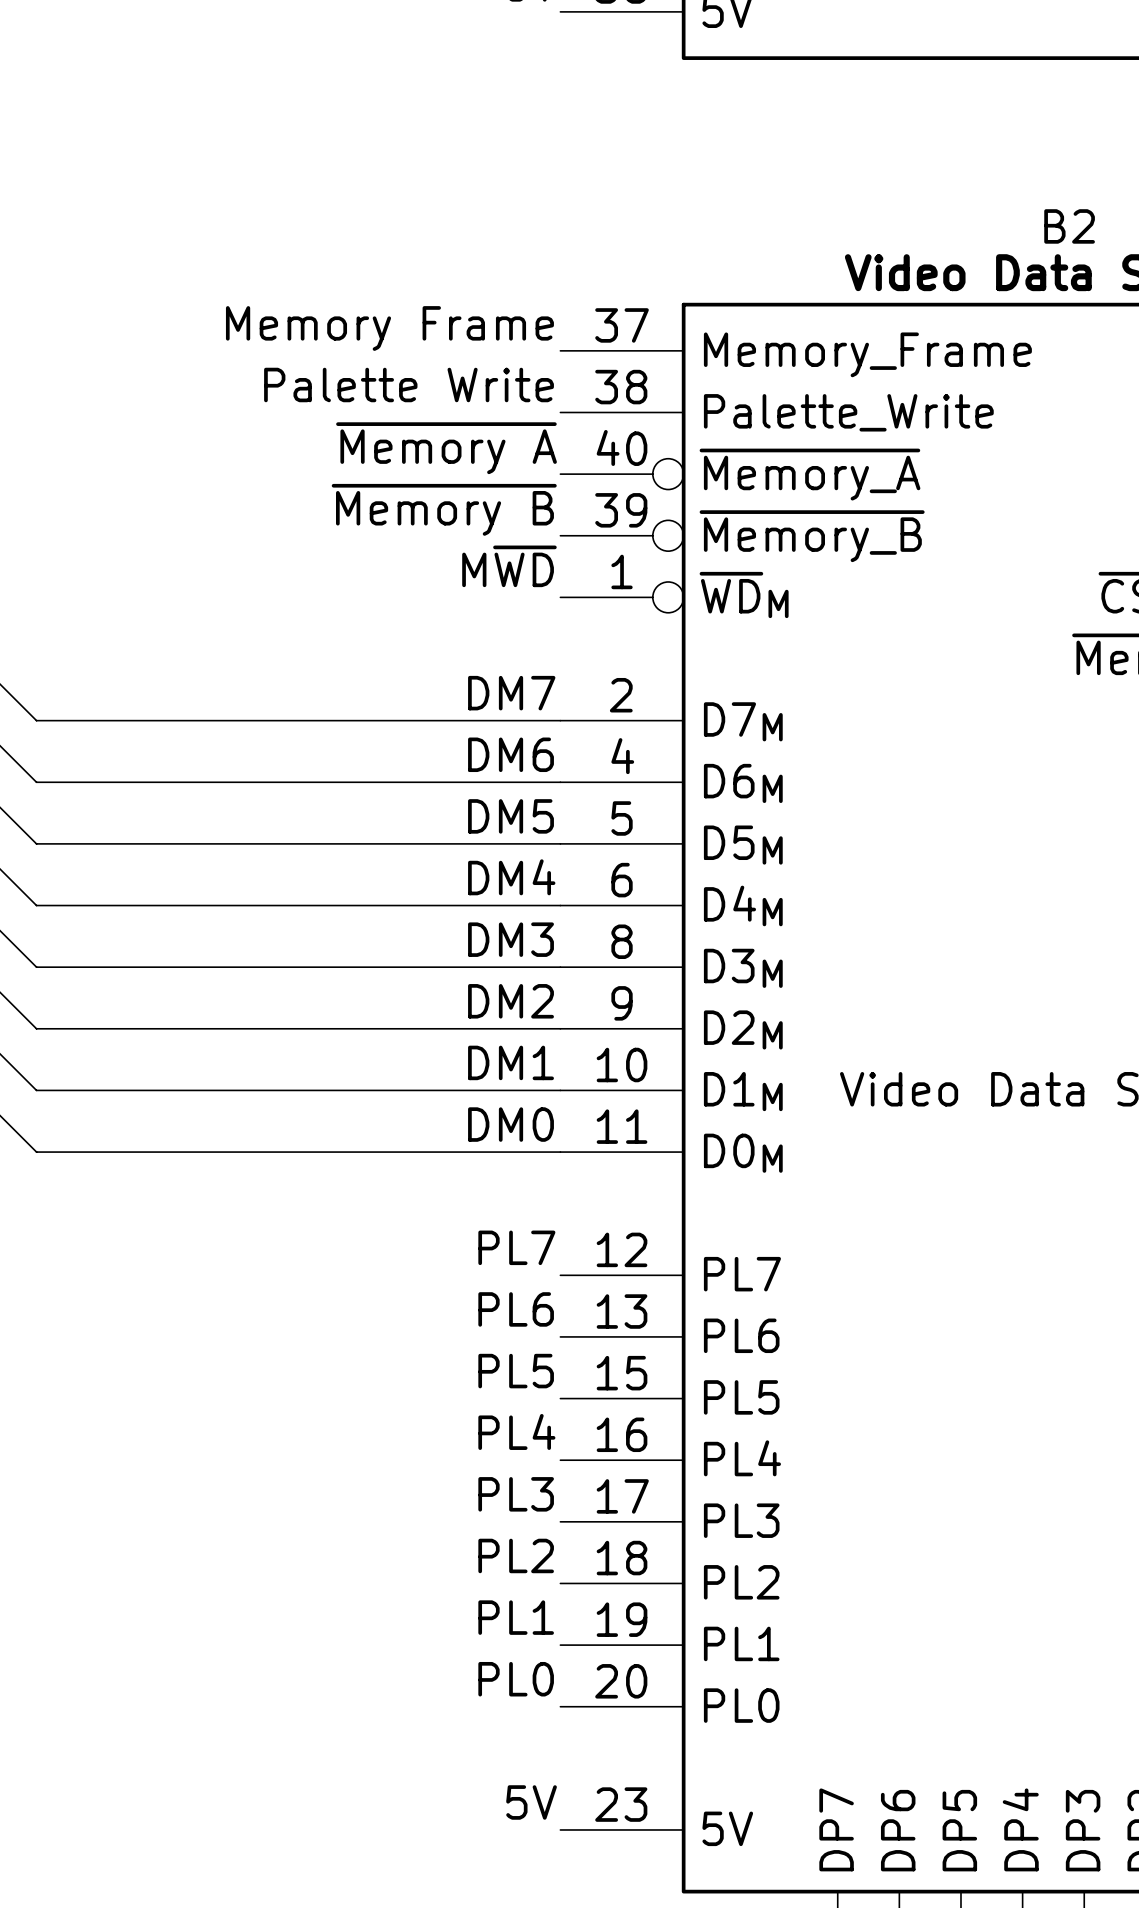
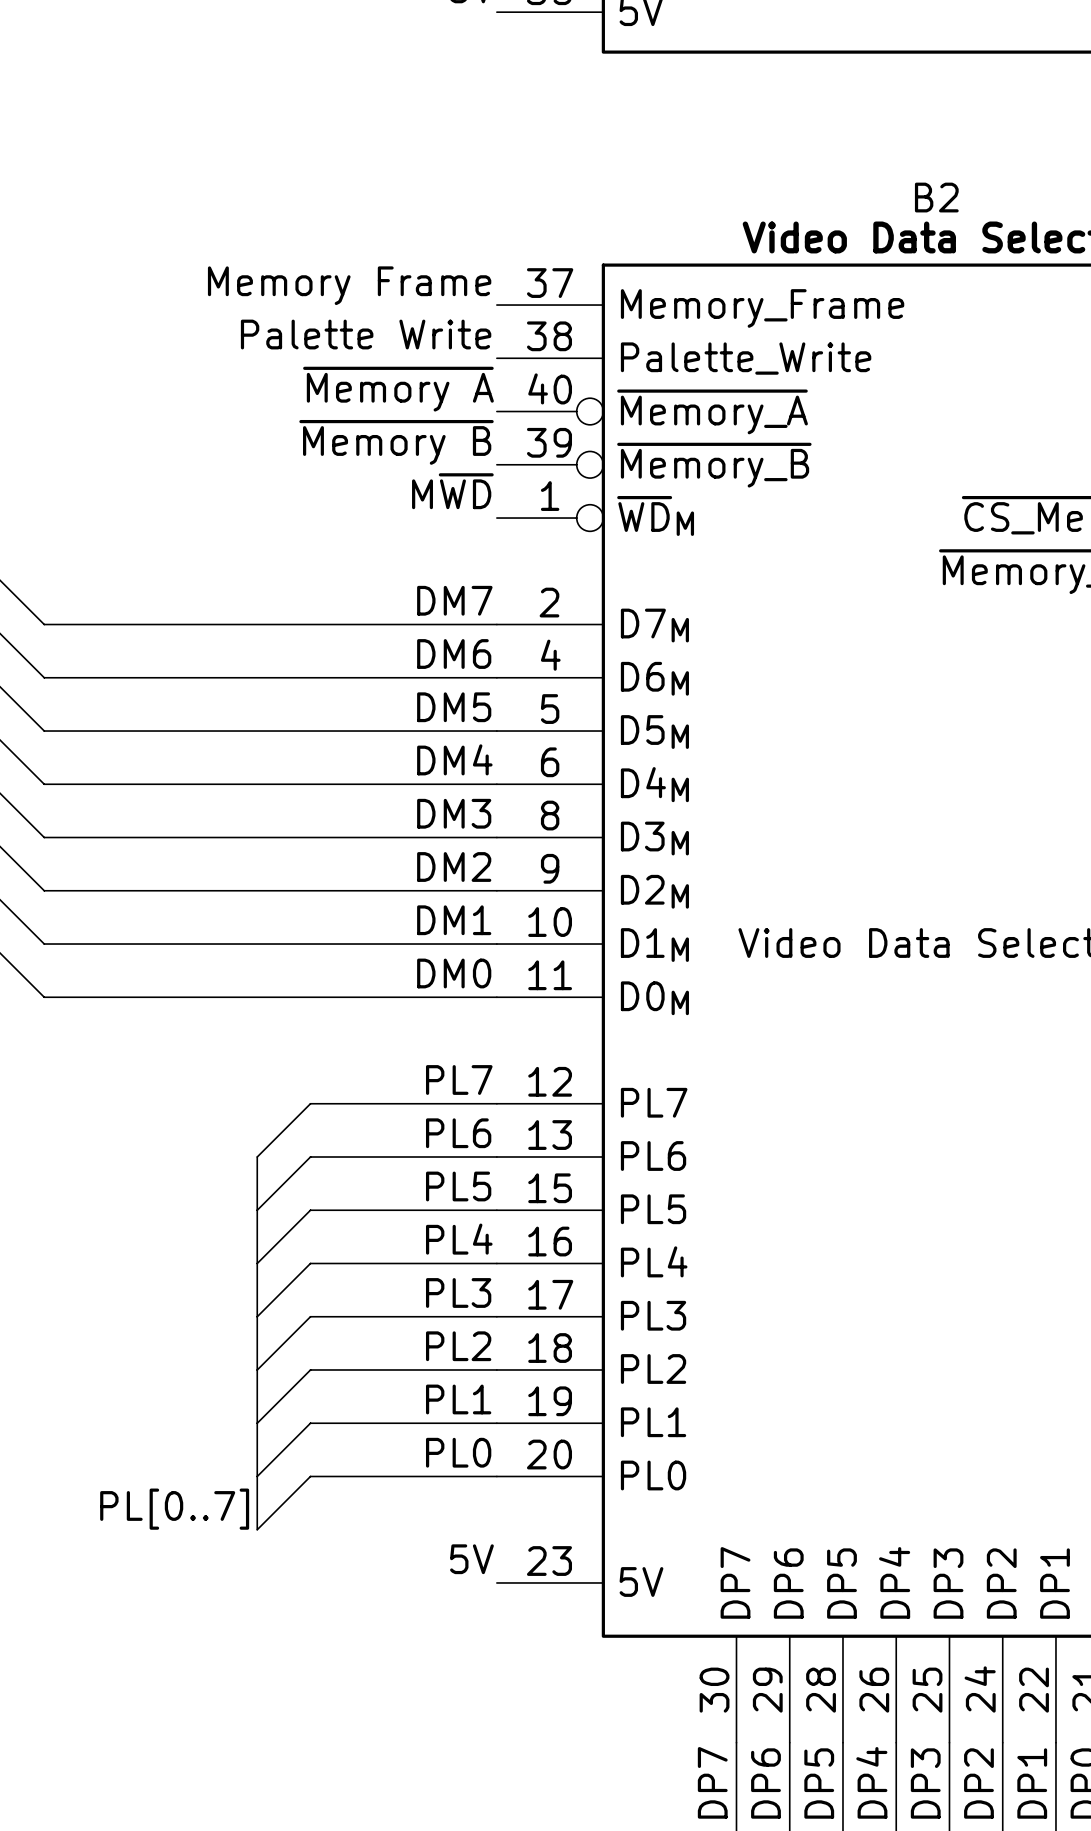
wire: none -> (496, 1103) (310, 1103) (257, 1157)
bus: none -> (257, 1157) (257, 1529)
wire: none -> (496, 1157) (310, 1157) (257, 1210)
wire: none -> (496, 1210) (310, 1210) (257, 1263)
wire: none -> (496, 1263) (310, 1263) (257, 1316)
wire: none -> (496, 1316) (310, 1316) (257, 1369)
wire: none -> (496, 1369) (310, 1369) (257, 1423)
wire: none -> (496, 1423) (310, 1423) (257, 1476)
wire: none -> (496, 1476) (310, 1476) (257, 1529)
label: none -> PL[0..7] (174, 1509)

